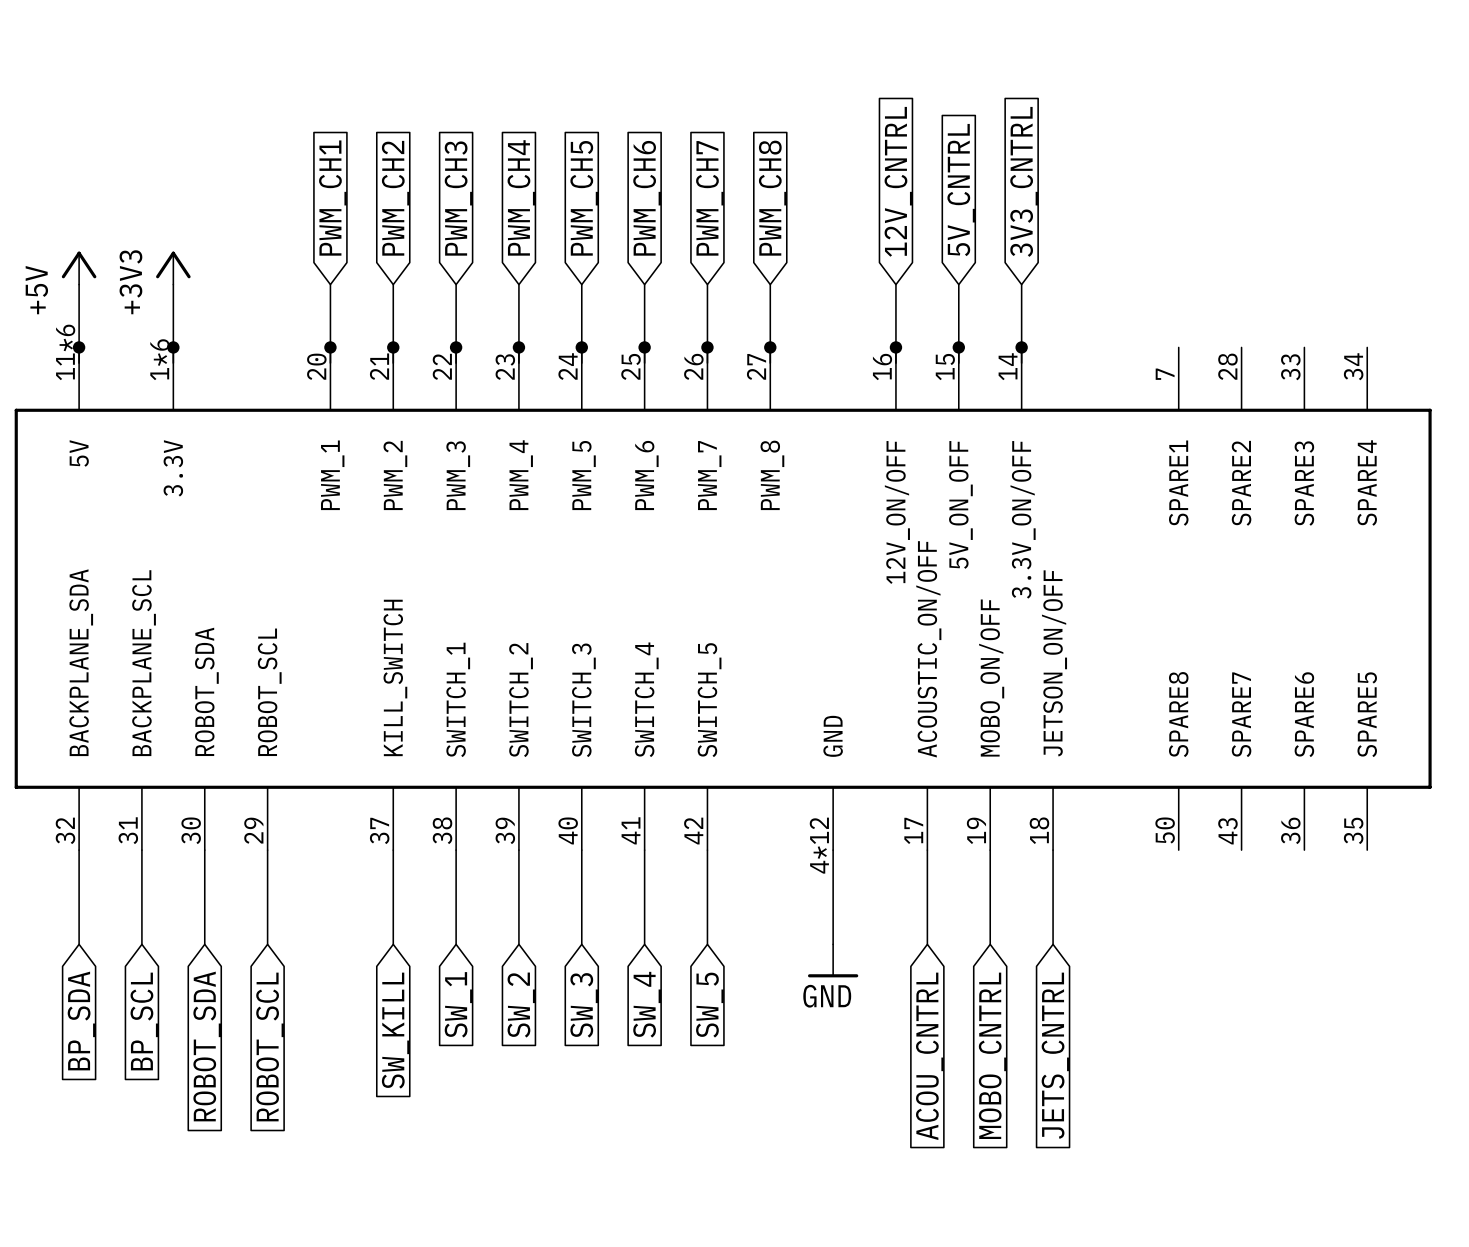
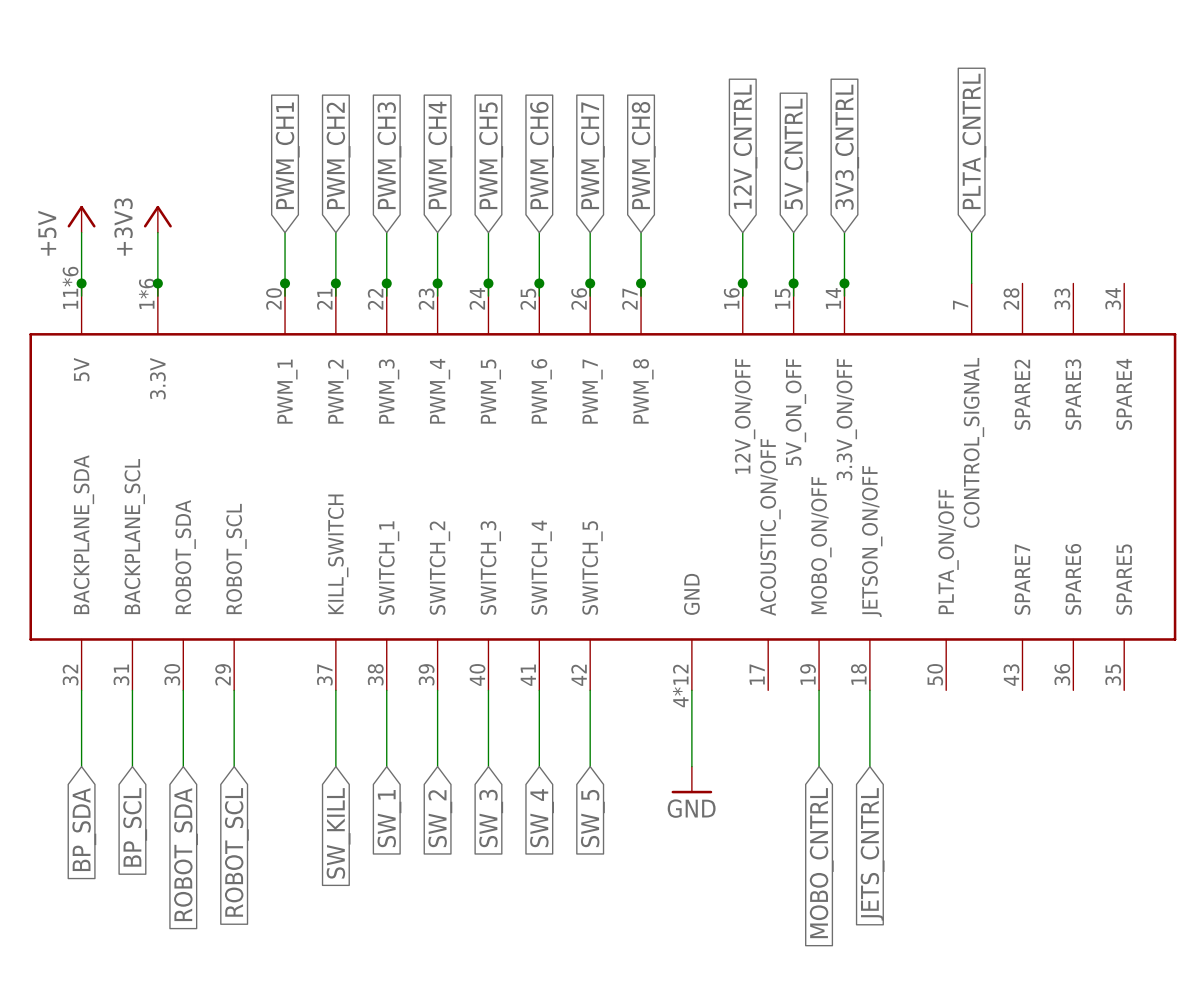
global label: none -> PLTA_CNTRL (974, 141)
wire: none -> (971, 232) (971, 283)
part symbol: [14, 347, 1432, 851] -> [29, 283, 1177, 691]
wire: (927, 850) (927, 944) -> none
global label: ACOU_CNTRL (929, 1056) -> none

